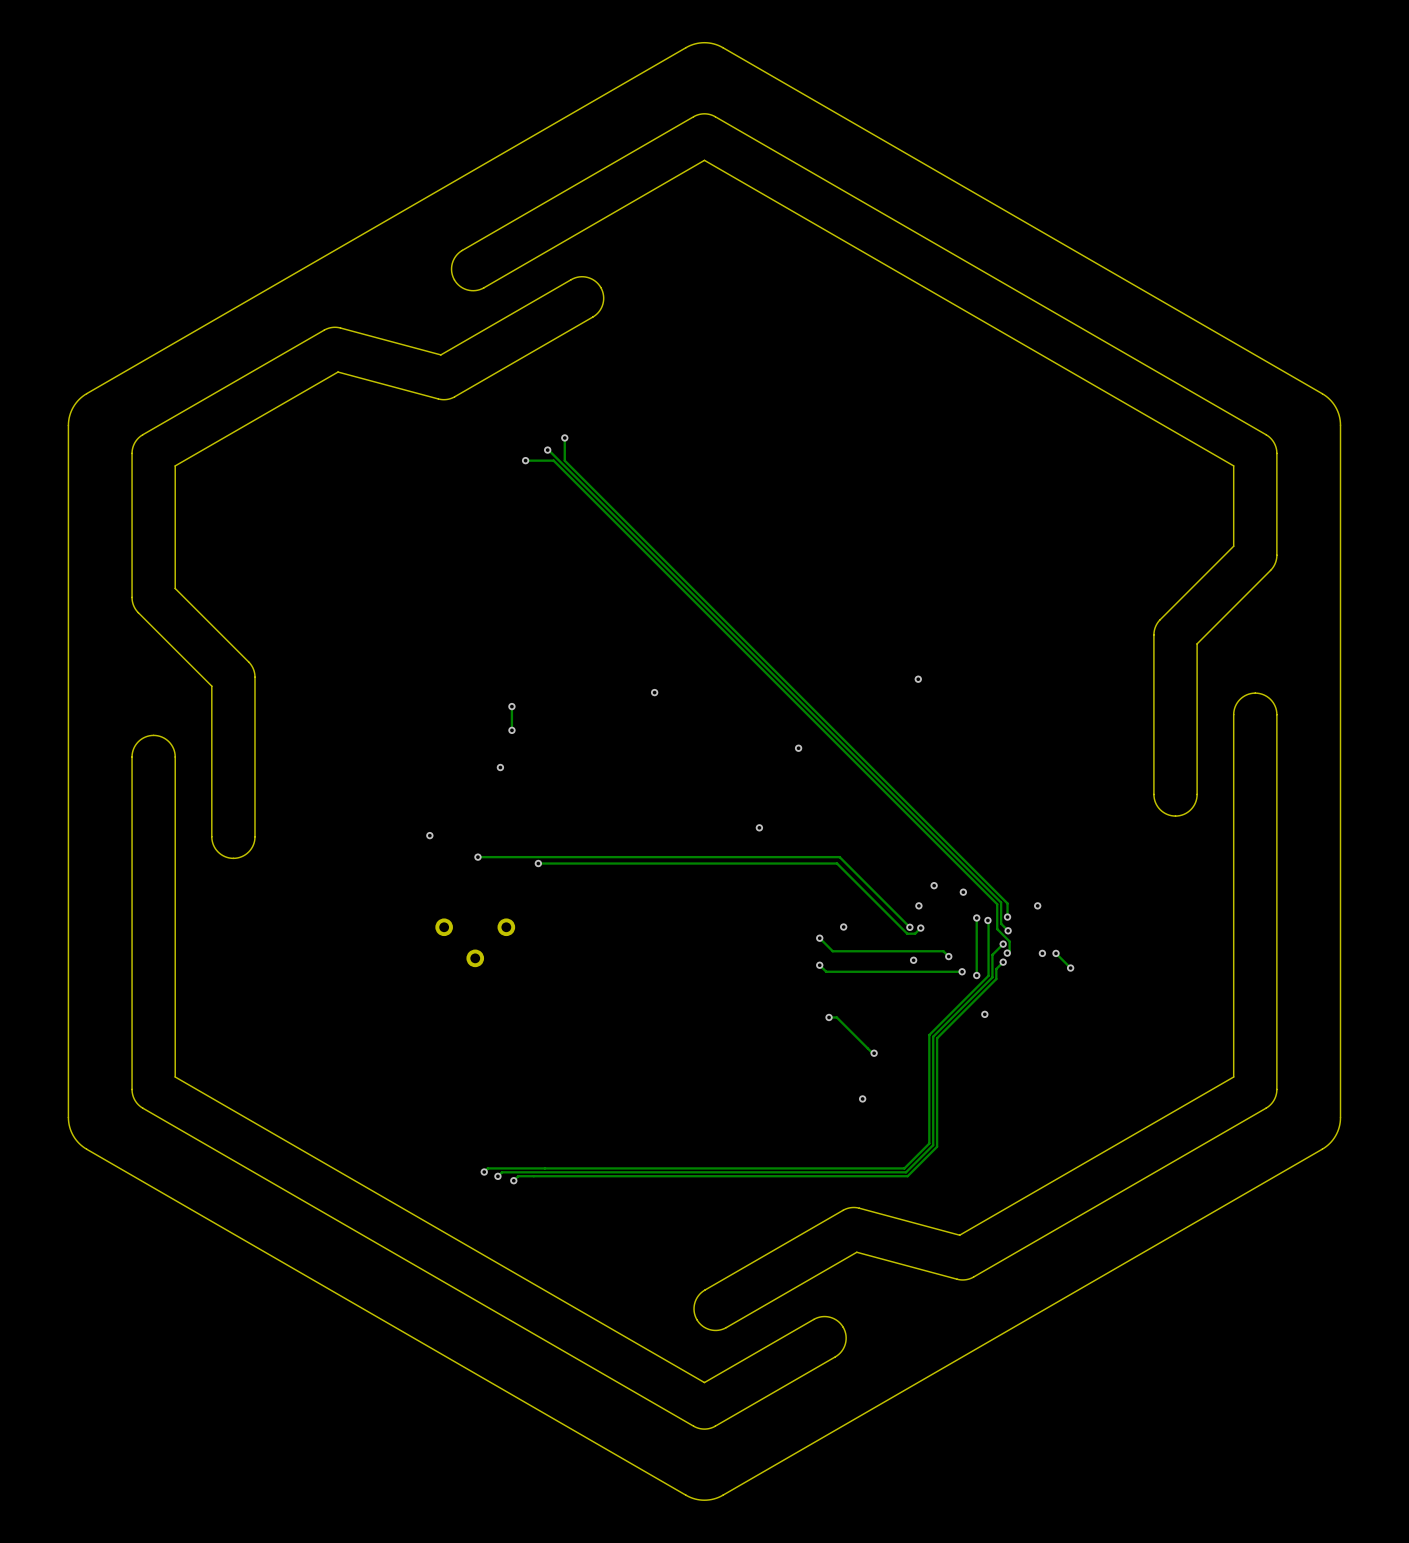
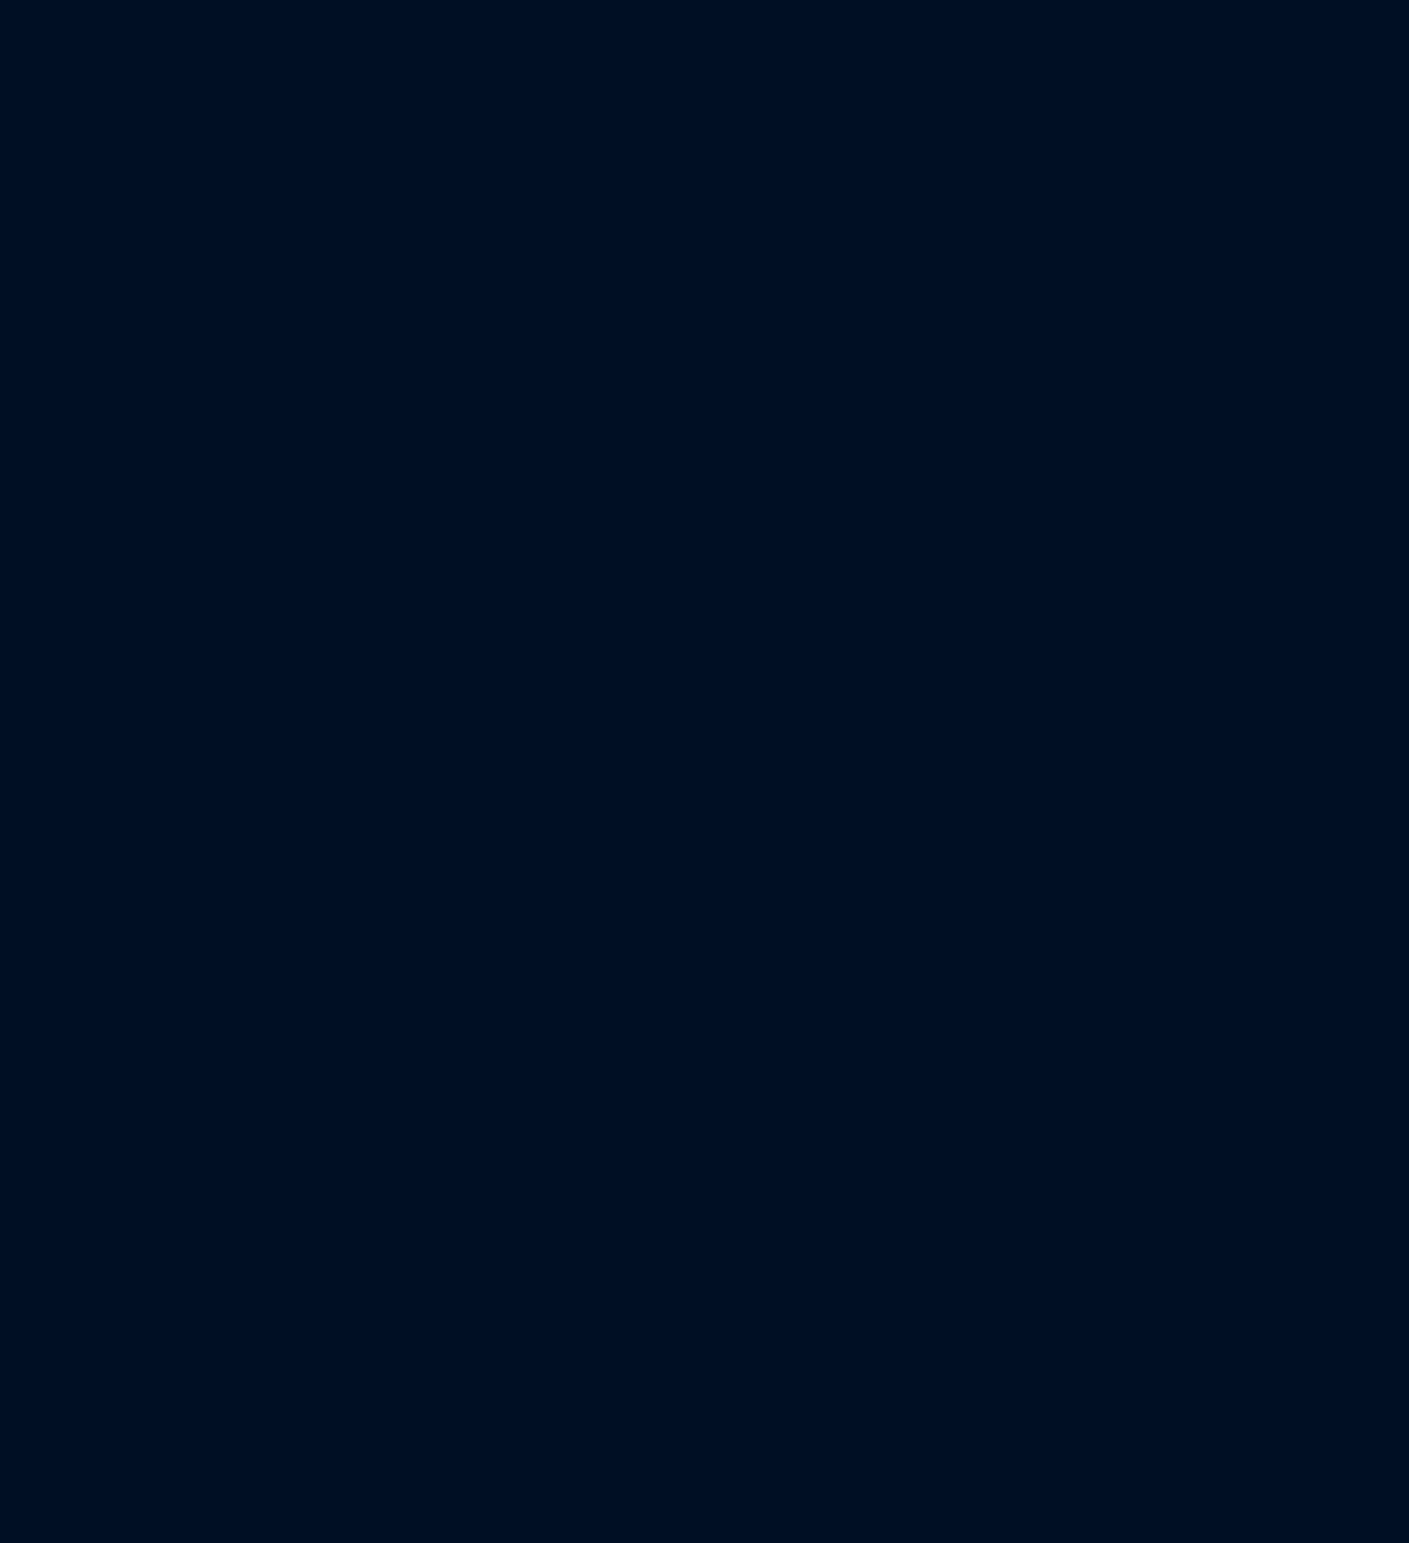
board edge: (722, 47) (1322, 393) (1335, 407) (1340, 425) (1340, 1117) (1335, 1135) (1322, 1149) (722, 1495) (704, 1500) (686, 1495) (86, 1149) (73, 1135) (68, 1117) (68, 425) (73, 407) (86, 393) (686, 47) (704, 42) (722, 47) -> none
board edge: (715, 116) (1266, 434) (1273, 441) (1276, 453) (1276, 560) (1271, 569) (1197, 643) (1196, 796) (1194, 804) (1187, 812) (1177, 815) (1167, 814) (1158, 808) (1154, 798) (1154, 631) (1159, 620) (1233, 546) (1233, 465) (704, 160) (481, 288) (473, 290) (465, 289) (454, 279) (451, 271) (452, 263) (455, 256) (462, 250) (694, 116) (705, 113) (715, 116) -> none
board edge: (571, 279) (440, 354) (339, 327) (327, 328) (142, 434) (134, 442) (132, 453) (132, 601) (137, 611) (211, 686) (211, 838) (215, 848) (223, 855) (233, 858) (241, 856) (250, 850) (254, 841) (254, 675) (249, 662) (175, 588) (175, 465) (338, 372) (439, 399) (452, 397) (597, 312) (603, 299) (599, 285) (593, 279) (585, 277) (571, 279) -> none
track: (564, 437) (564, 460) (1007, 903) (1007, 917) -> none
via: (564, 437) -> none
track: (547, 450) (1001, 902) (1001, 923) (1008, 930) -> none
via: (547, 450) -> none
track: (525, 460) (553, 460) (997, 904) (997, 929) (1009, 941) (1009, 950) (1007, 953) -> none
via: (525, 460) -> none
via: (918, 679) -> none
via: (654, 692) -> none
board edge: (1255, 693) (1263, 694) (1270, 699) (1275, 706) (1276, 714) (1276, 1089) (1271, 1103) (970, 1278) (958, 1279) (856, 1252) (724, 1328) (712, 1330) (700, 1324) (695, 1317) (694, 1309) (696, 1299) (701, 1292) (844, 1209) (858, 1207) (959, 1235) (1233, 1077) (1233, 712) (1236, 704) (1241, 698) (1255, 693) -> none
track: (511, 706) (511, 730) -> none
via: (511, 706) -> none
via: (511, 730) -> none
board edge: (153, 735) (167, 740) (172, 746) (175, 754) (175, 1077) (704, 1382) (819, 1317) (834, 1318) (843, 1327) (846, 1339) (840, 1352) (713, 1426) (705, 1429) (697, 1427) (139, 1105) (133, 1097) (132, 1089) (132, 757) (133, 748) (138, 741) (145, 737) (153, 735) -> none
via: (798, 748) -> none
via: (500, 767) -> none
via: (759, 827) -> none
via: (429, 835) -> none
track: (477, 857) (839, 857) (909, 927) -> none
via: (477, 857) -> none
track: (538, 863) (837, 863) (907, 933) (915, 933) (920, 928) -> none
via: (538, 863) -> none
via: (934, 885) -> none
via: (963, 892) -> none
via: (918, 905) -> none
via: (1037, 905) -> none
track: (976, 917) (976, 975) -> none
via: (976, 917) -> none
via: (1007, 917) -> none
track: (987, 920) (988, 975) (929, 1035) (929, 1143) (904, 1168) (487, 1168) (484, 1172) -> none
via: (987, 920) -> none
via: (843, 927) -> none
via: (909, 927) -> none
via: (920, 928) -> none
via: (1008, 930) -> none
track: (819, 938) (832, 951) (943, 951) (948, 956) -> none
via: (819, 938) -> none
part: (475, 942) -> none
track: (1003, 944) (992, 954) (992, 977) (933, 1036) (933, 1145) (906, 1172) (501, 1172) (497, 1176) -> none
via: (1003, 944) -> none
via: (1007, 953) -> none
via: (1042, 953) -> none
track: (1056, 953) (1070, 968) -> none
via: (1056, 953) -> none
via: (948, 956) -> none
via: (913, 960) -> none
track: (1003, 962) (996, 969) (996, 979) (937, 1038) (937, 1146) (907, 1176) (518, 1176) (513, 1180) -> none
via: (1003, 962) -> none
track: (819, 965) (826, 971) (962, 971) -> none
via: (819, 965) -> none
via: (1070, 968) -> none
via: (962, 971) -> none
via: (976, 975) -> none
via: (984, 1014) -> none
track: (829, 1017) (836, 1017) (874, 1053) -> none
via: (829, 1017) -> none
via: (874, 1053) -> none
via: (862, 1098) -> none
via: (484, 1172) -> none
via: (497, 1176) -> none
via: (513, 1180) -> none

